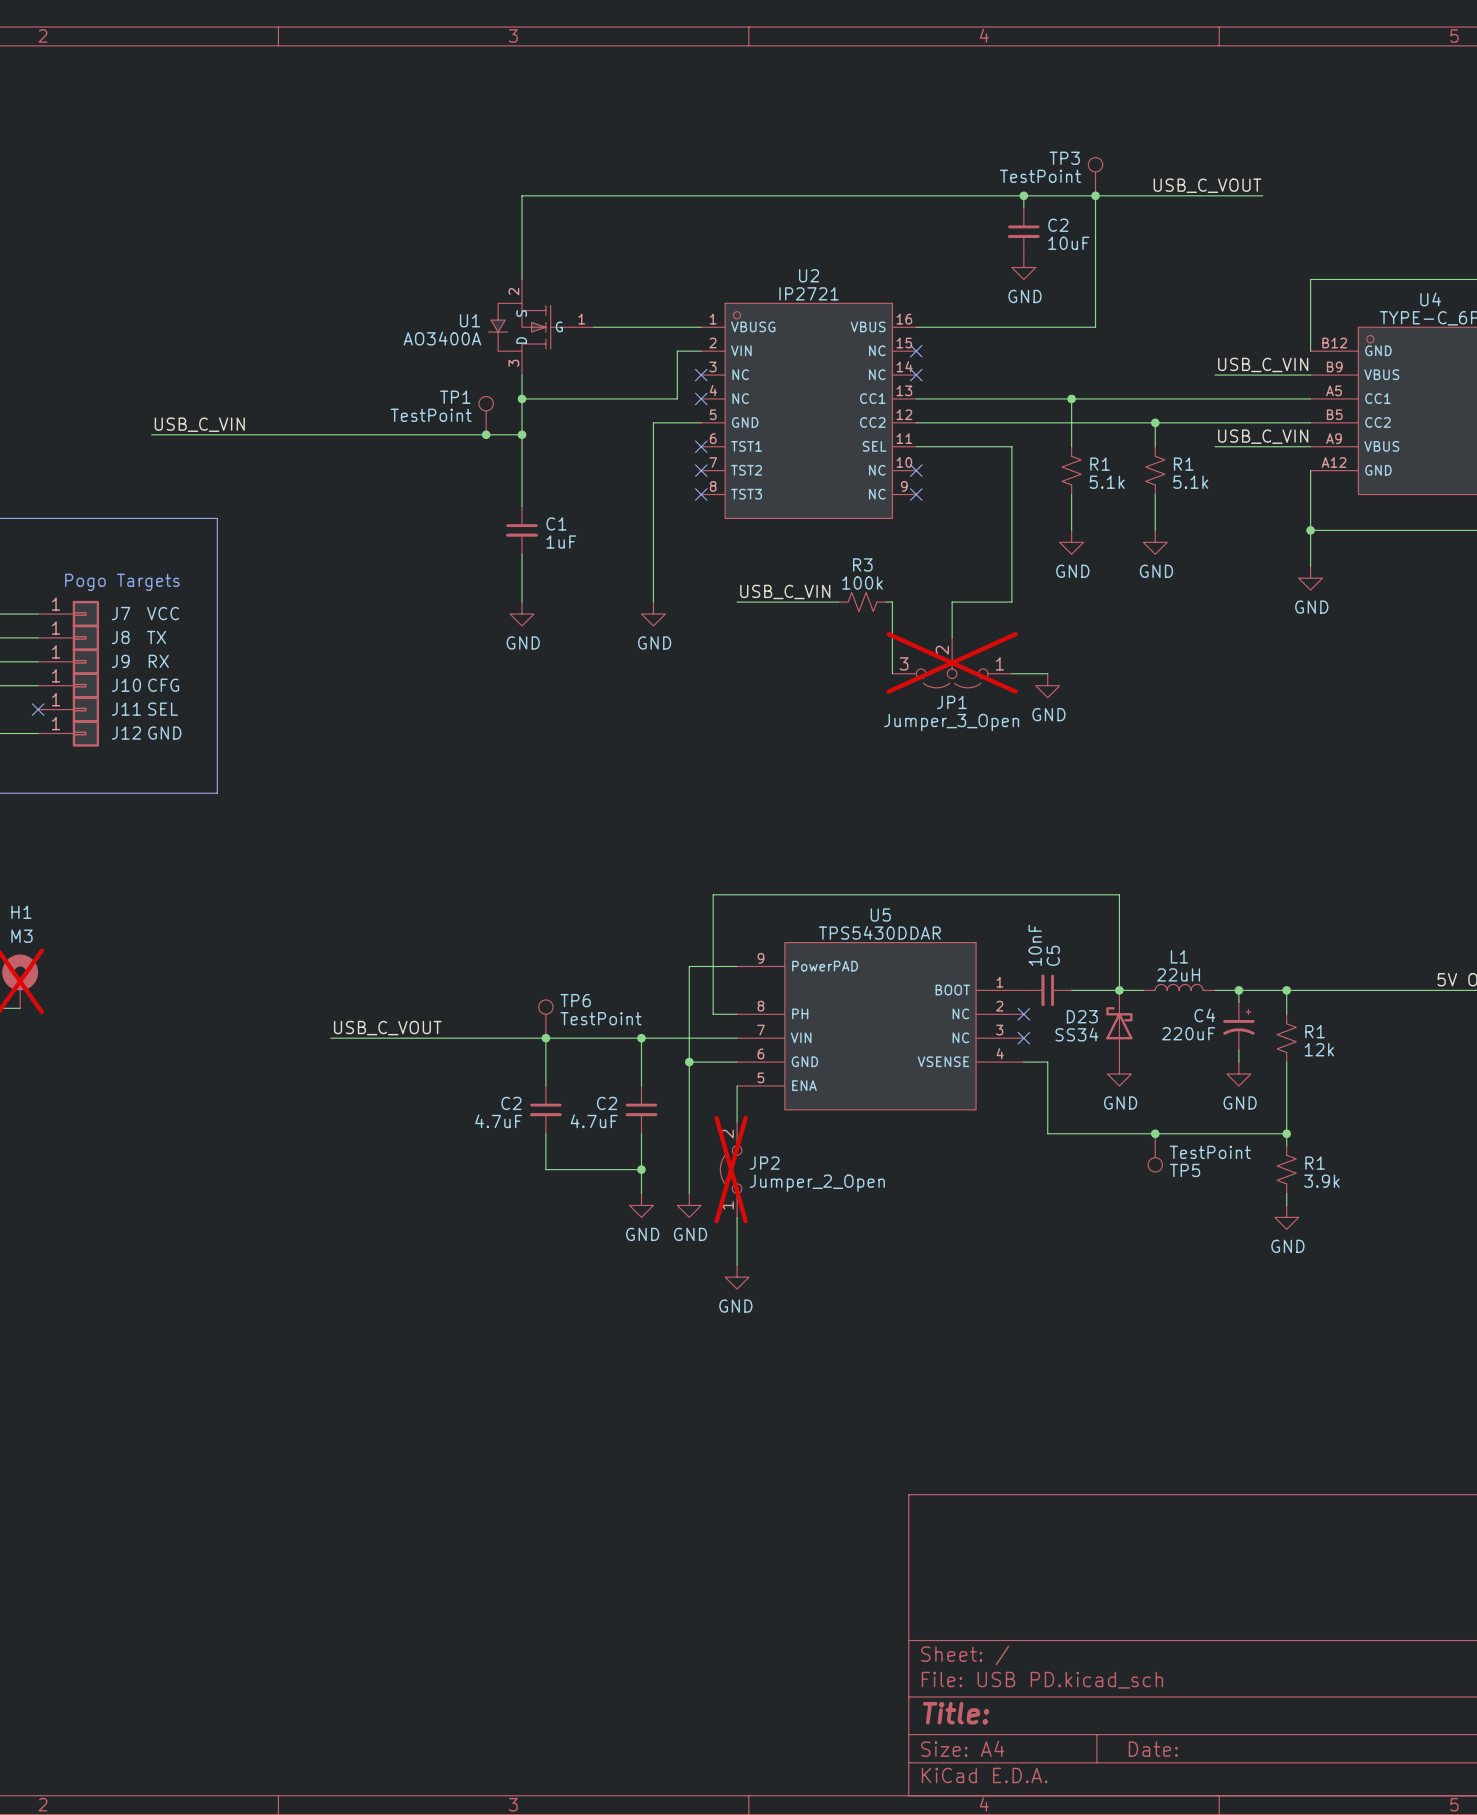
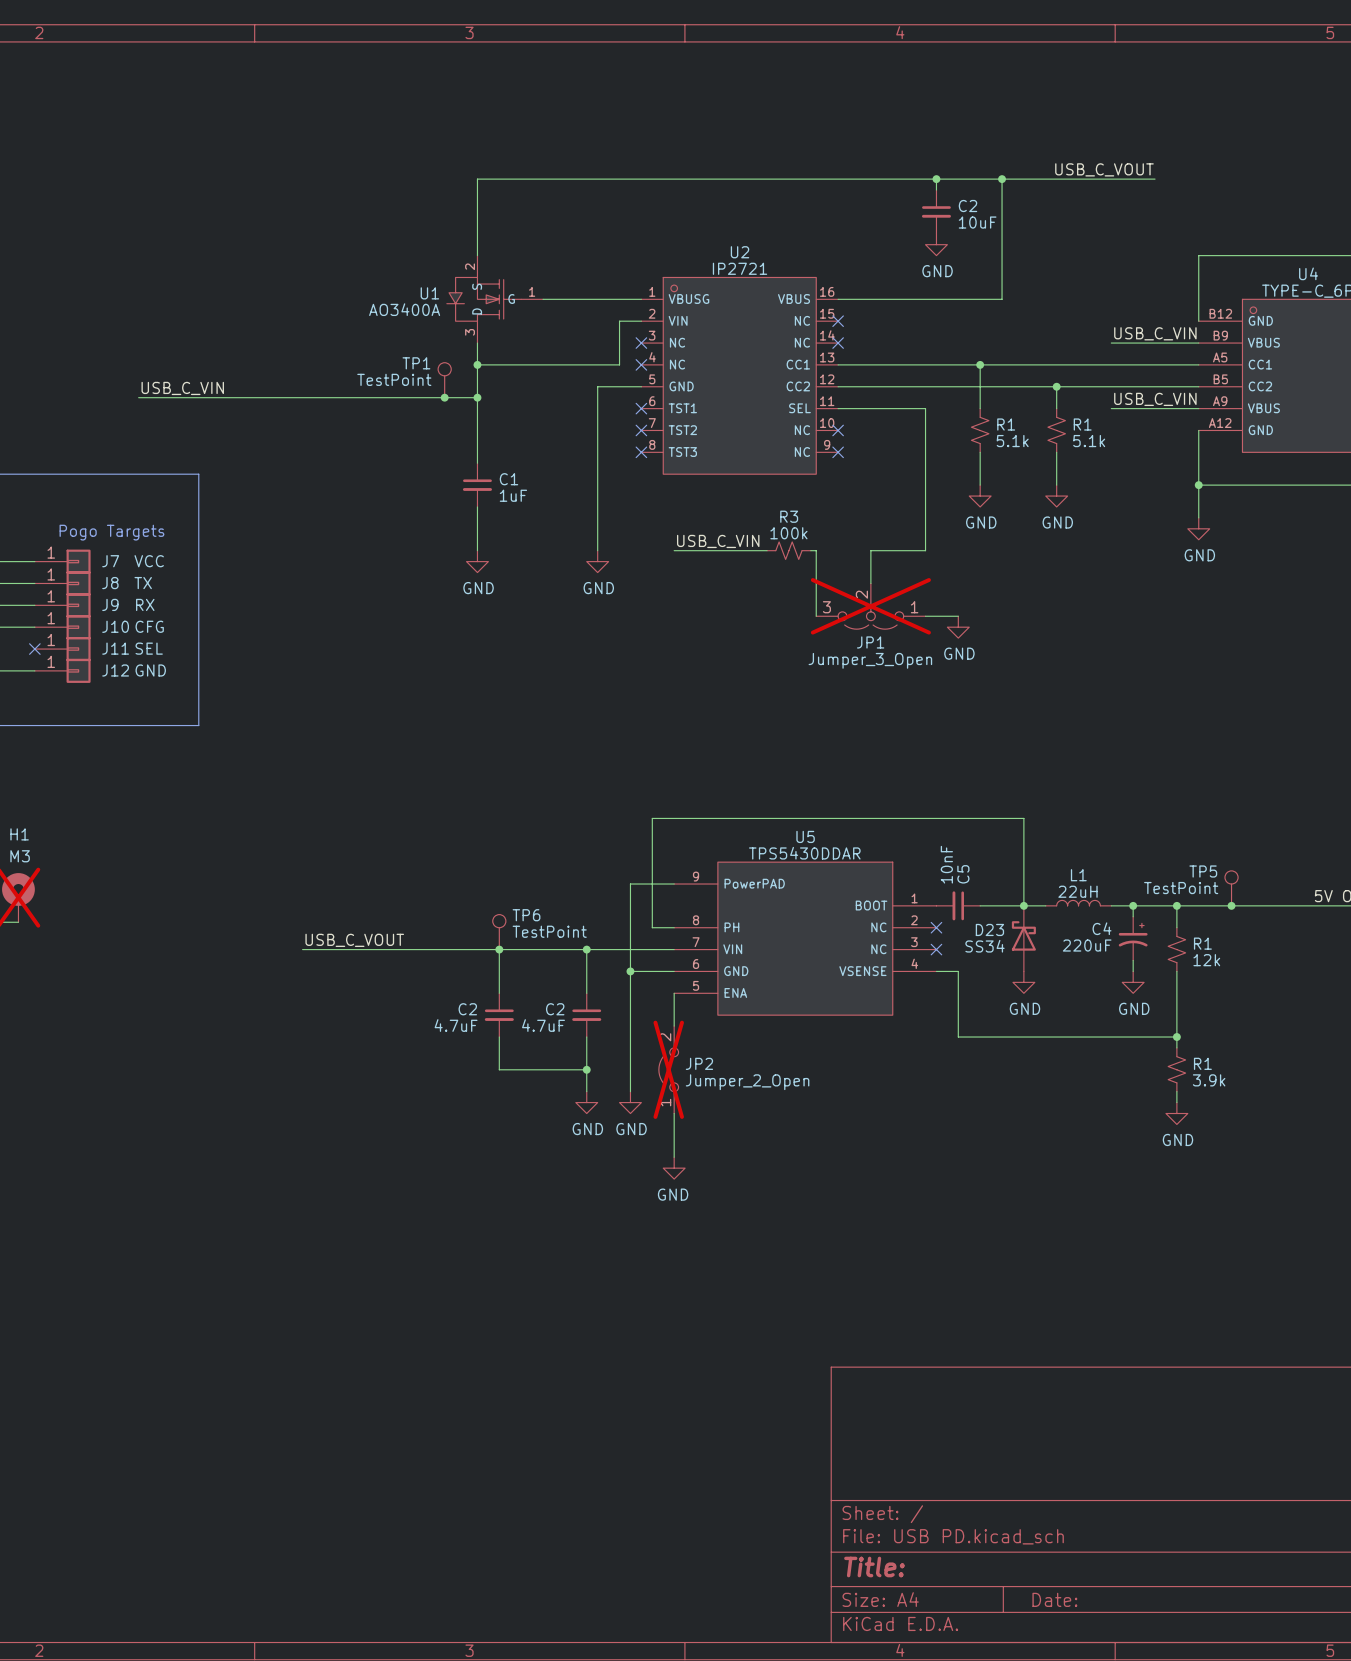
TP3: TestPoint (1095, 176) -> none
junction: none -> (1231, 905)
junction: (1155, 1133) -> none
TP5 position: (1155, 1152) -> (1231, 888)
TP5 rotation: 0° (1155, 1164) -> 180° (1231, 877)

